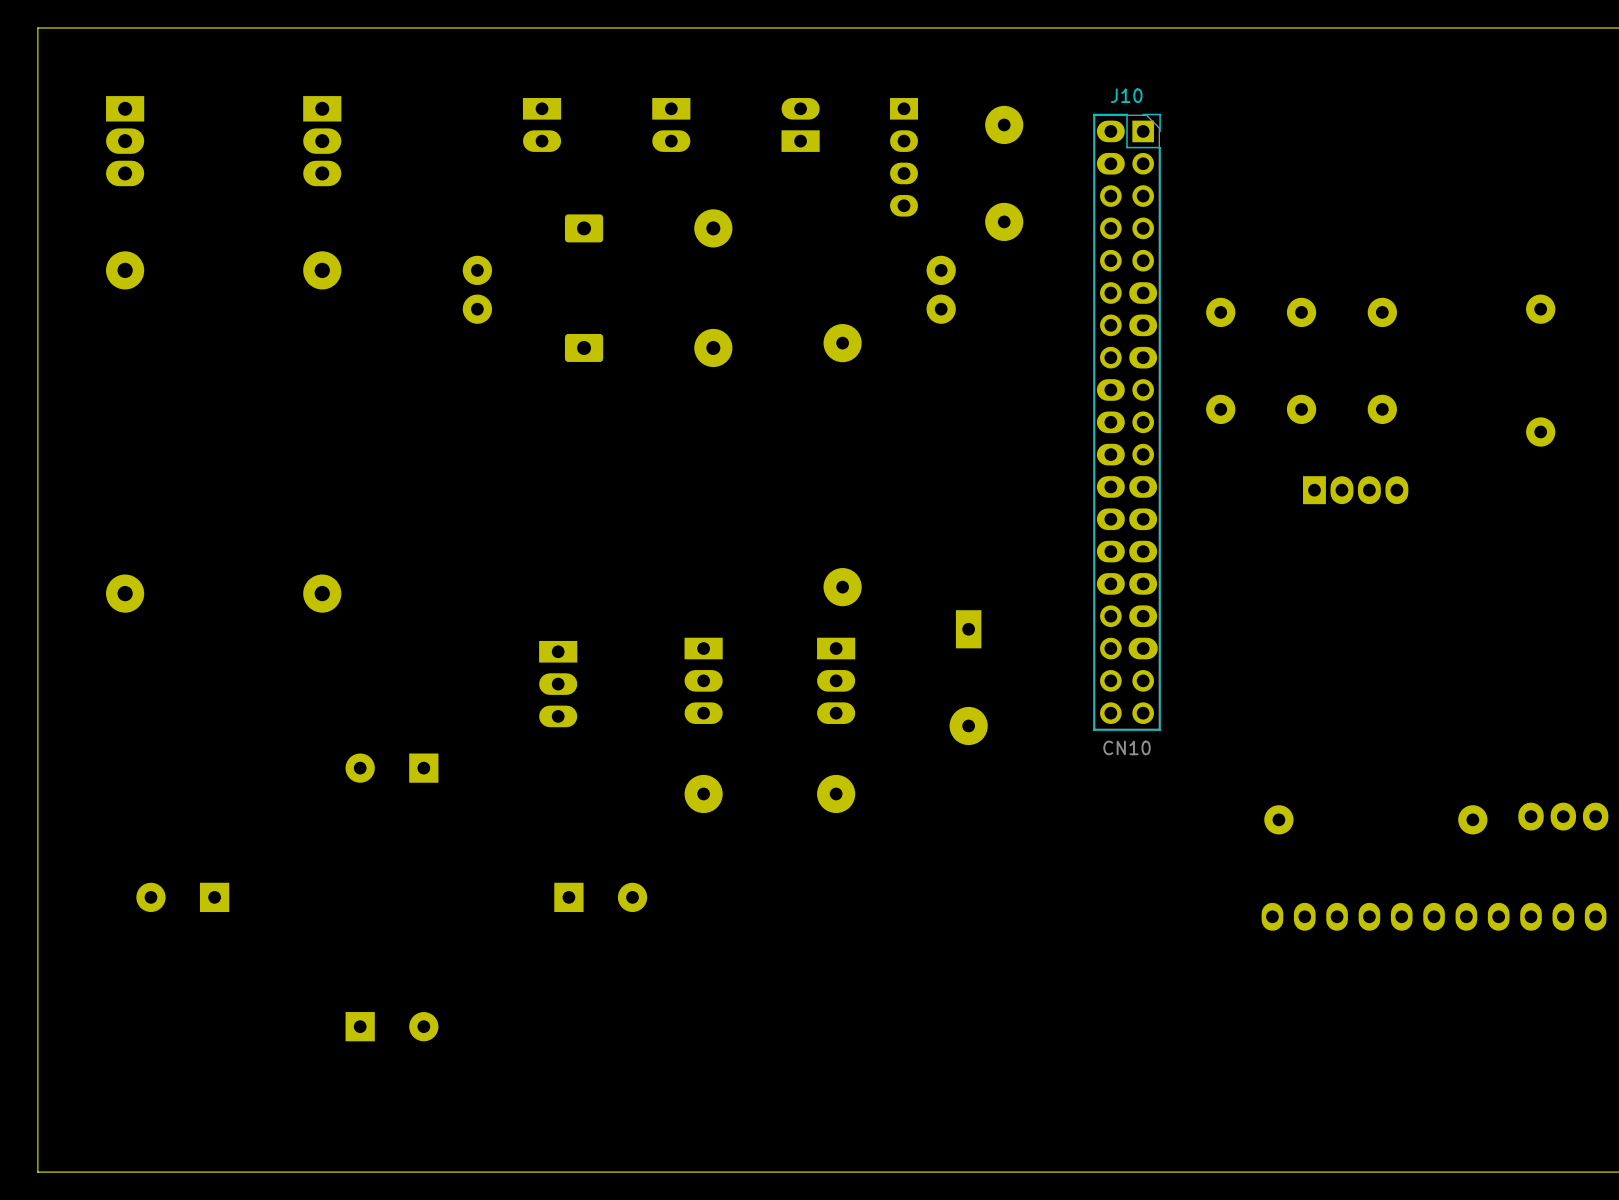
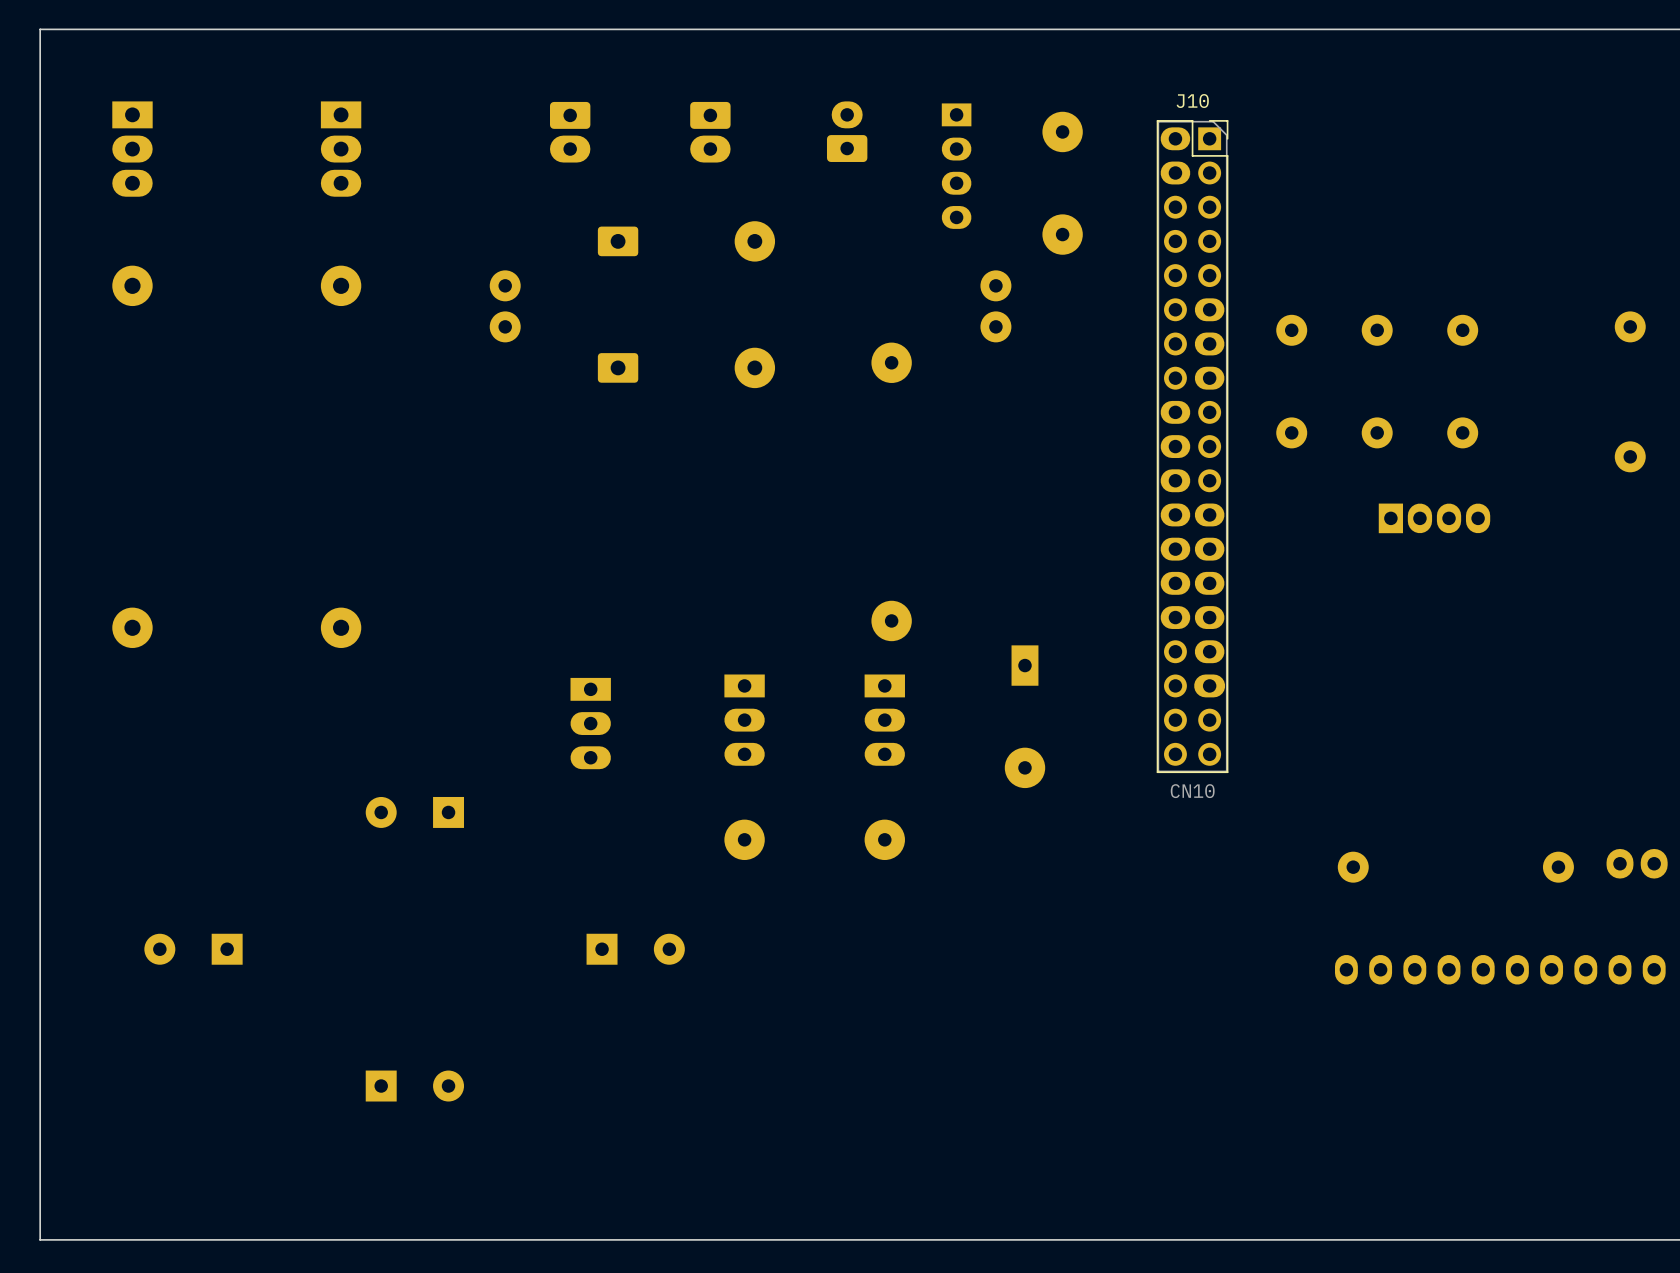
part footprint: [522, 97, 562, 152] -> [549, 101, 591, 163]
part footprint: [652, 97, 691, 152] -> [690, 101, 731, 163]
part footprint: [781, 97, 820, 152] -> [826, 101, 868, 162]

